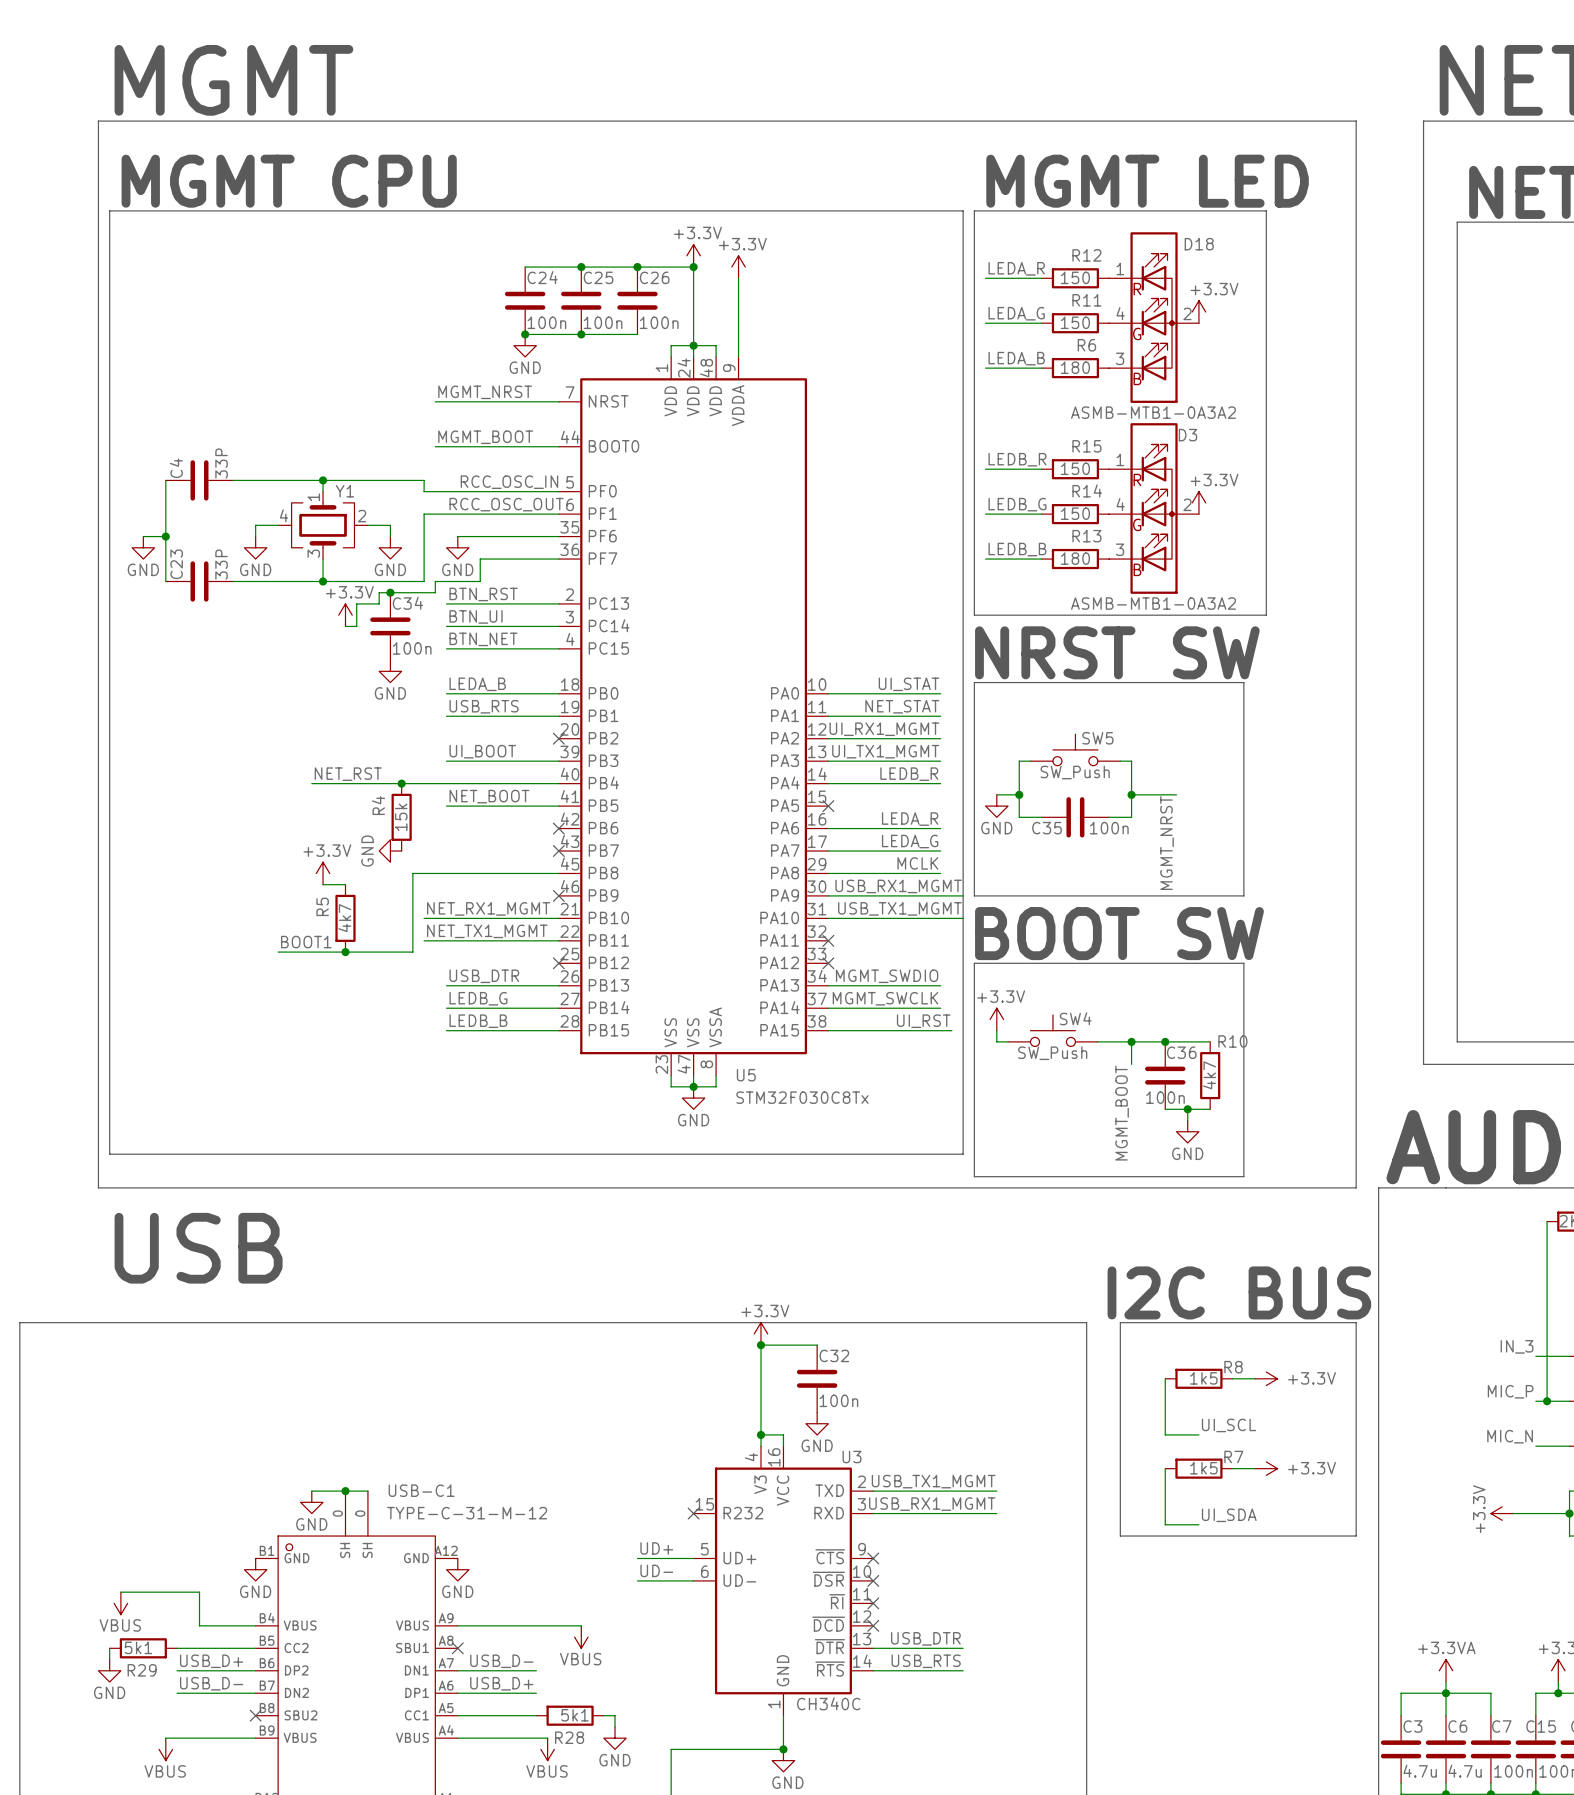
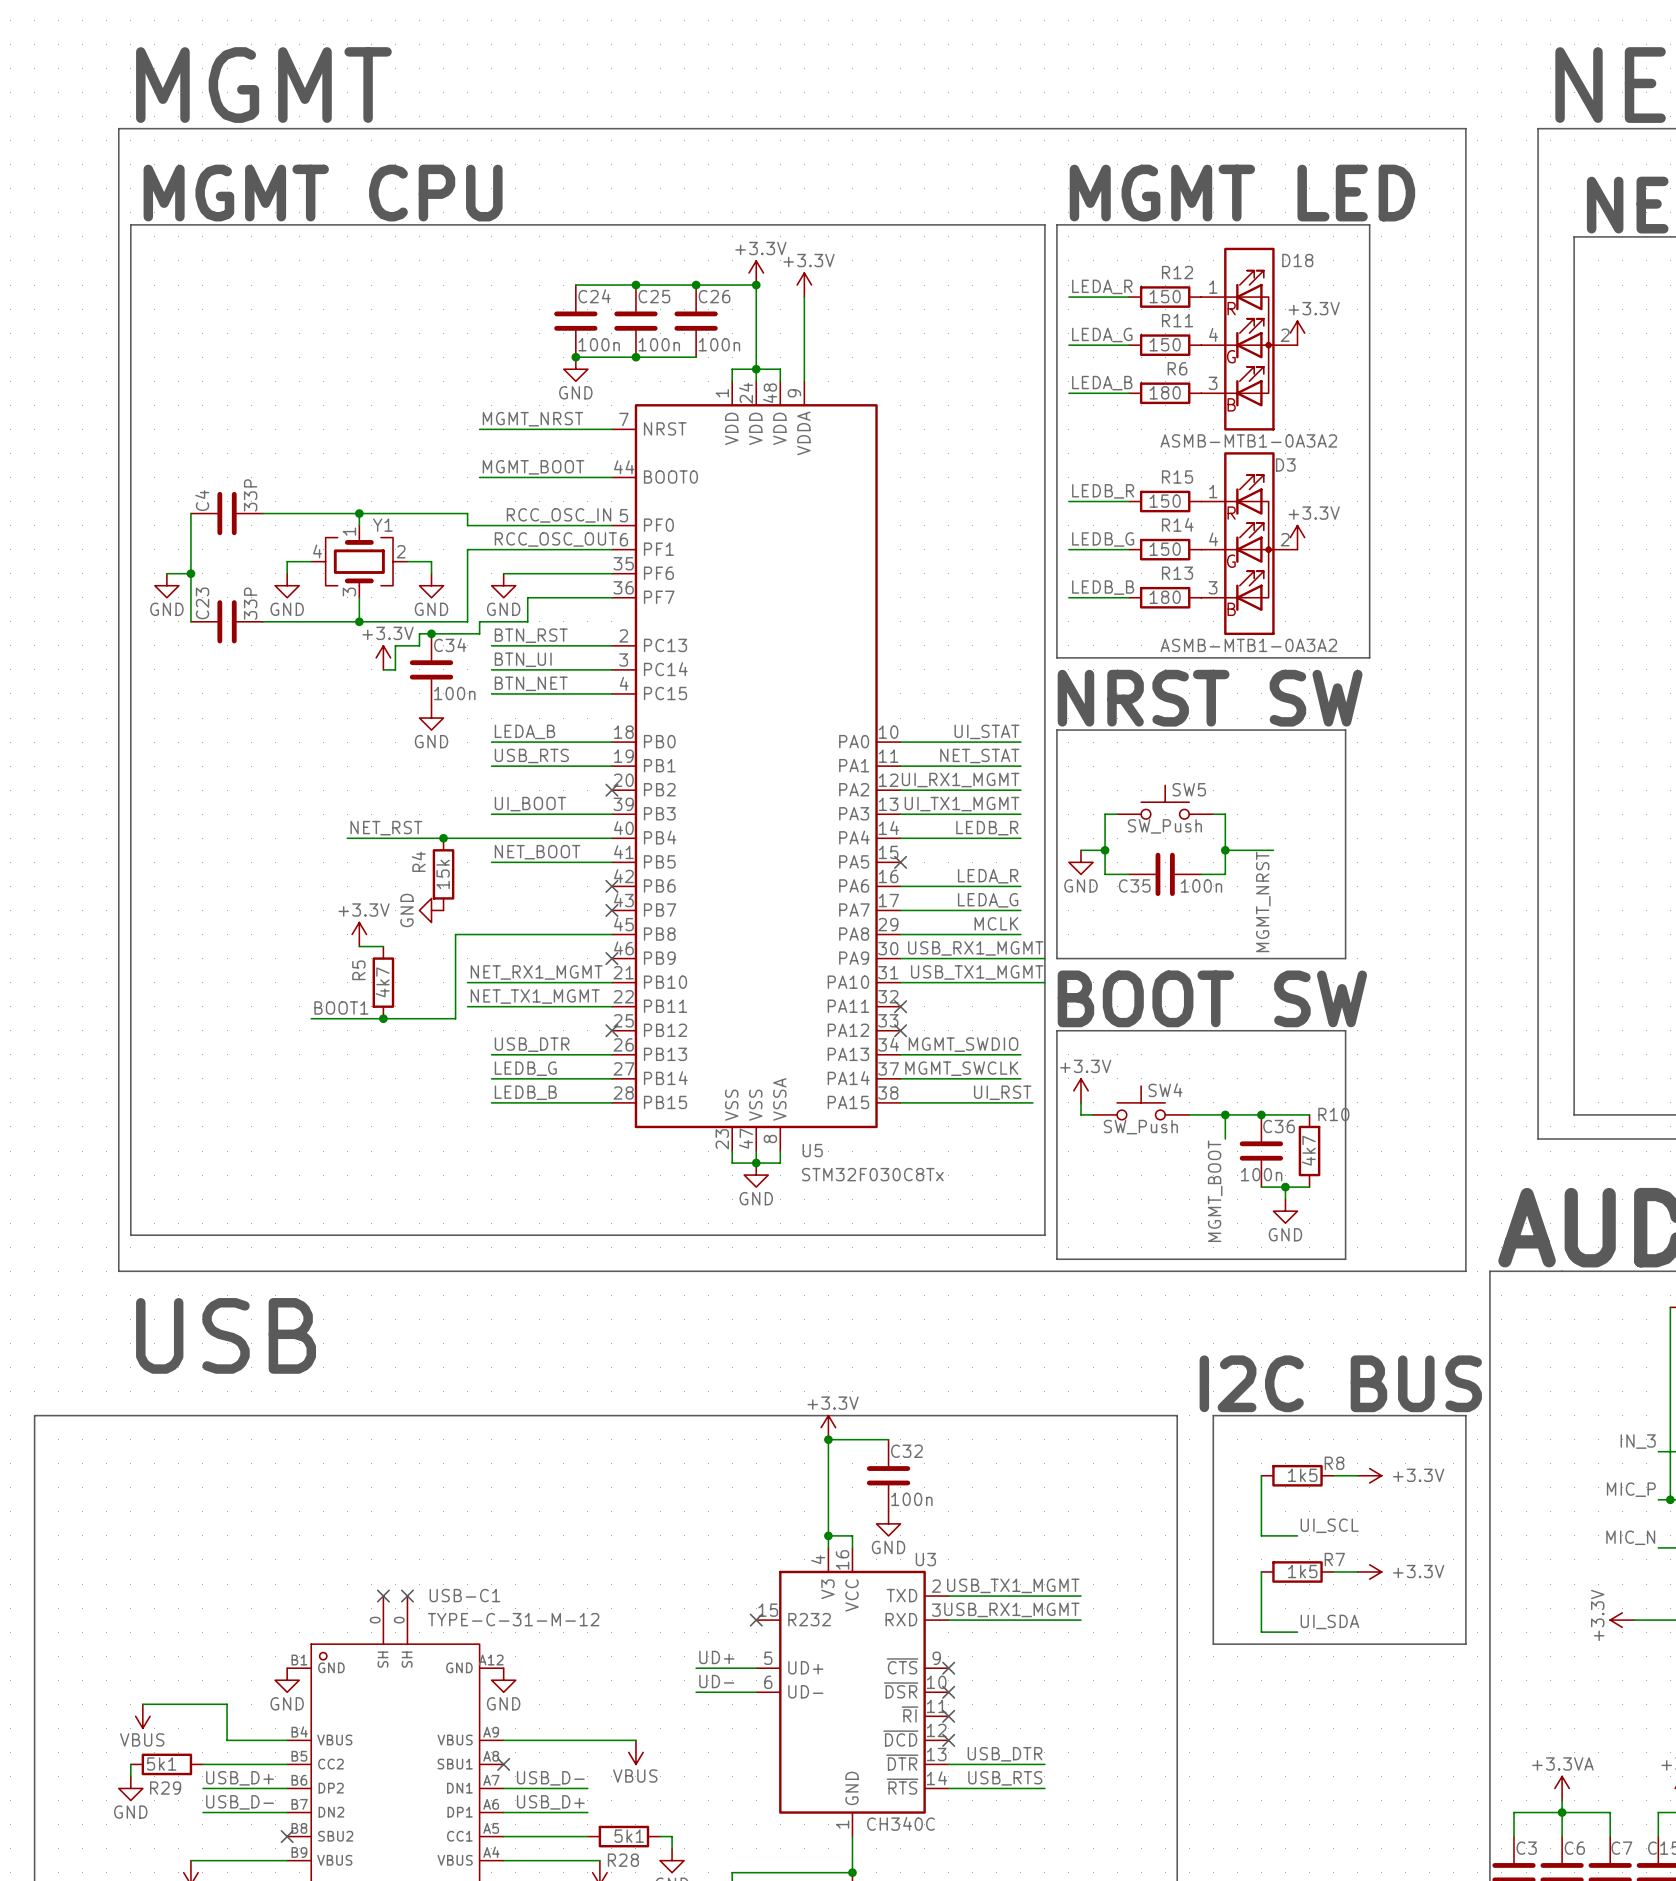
wire: (311, 1491) (367, 1491) -> none
junction: (345, 1491) -> none
no-connect mark: none -> (383, 1596)
no-connect mark: none -> (407, 1596)
power symbol: GND (311, 1502) -> none

